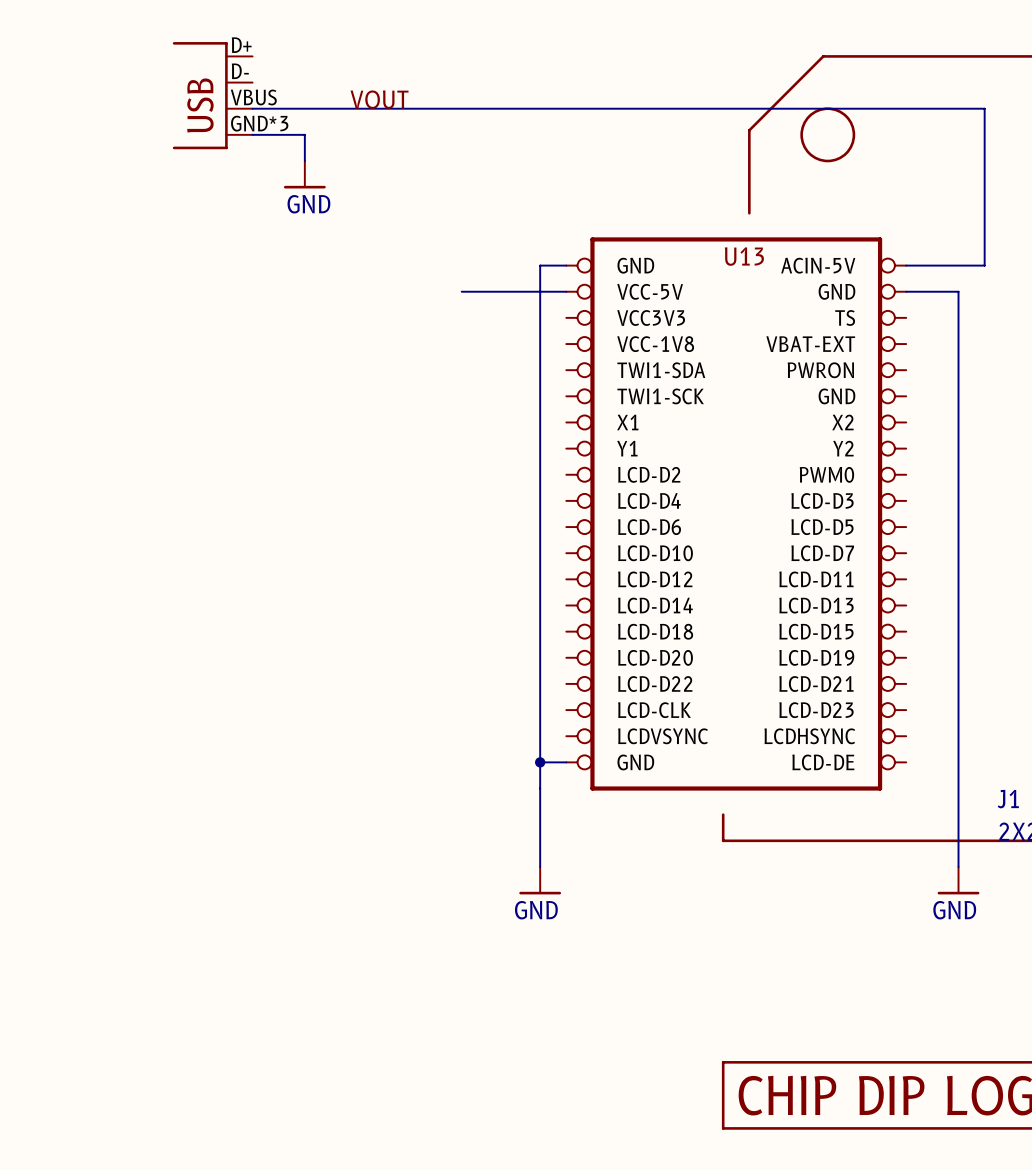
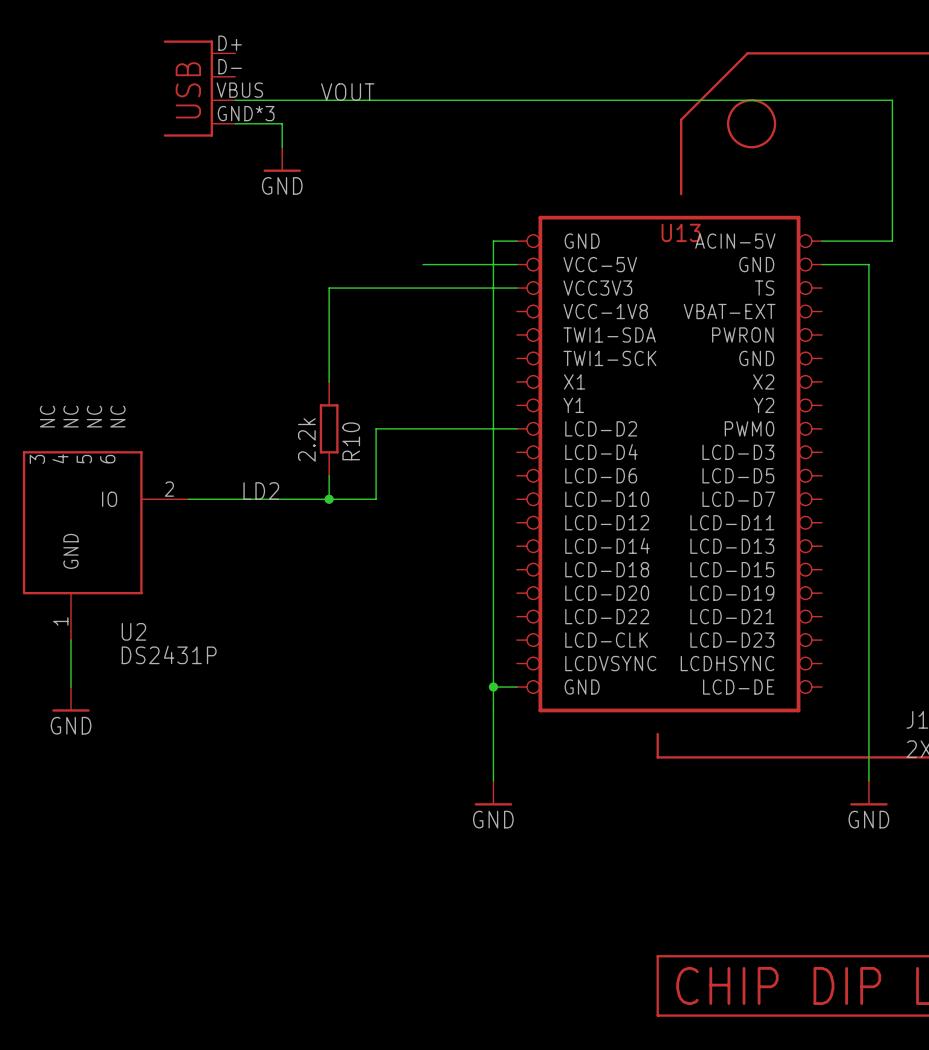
wire: none -> (516, 288) (329, 288) (329, 381)
R10: none -> 2.2k (329, 428)
wire: none -> (516, 428) (376, 428) (376, 499) (188, 499)
wire: none -> (329, 475) (329, 499)
label: none -> LD2 (261, 491)
junction: none -> (329, 499)
U2: none -> DS2431P (105, 545)
wire: none -> (71, 640) (71, 687)
power symbol: none -> GND (71, 699)

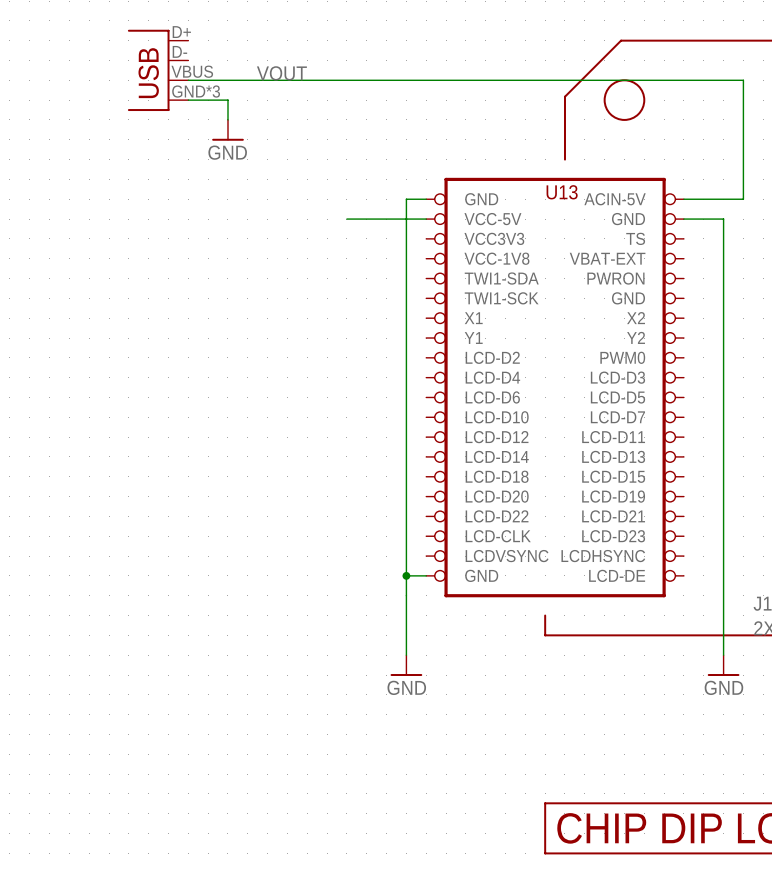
wire: (516, 288) (329, 288) (329, 381) -> none
R10: 2.2k (329, 428) -> none
wire: (516, 428) (376, 428) (376, 499) (188, 499) -> none
wire: (329, 475) (329, 499) -> none
label: LD2 (261, 491) -> none
junction: (329, 499) -> none
U2: DS2431P (105, 545) -> none
wire: (71, 640) (71, 687) -> none
power symbol: GND (71, 699) -> none

